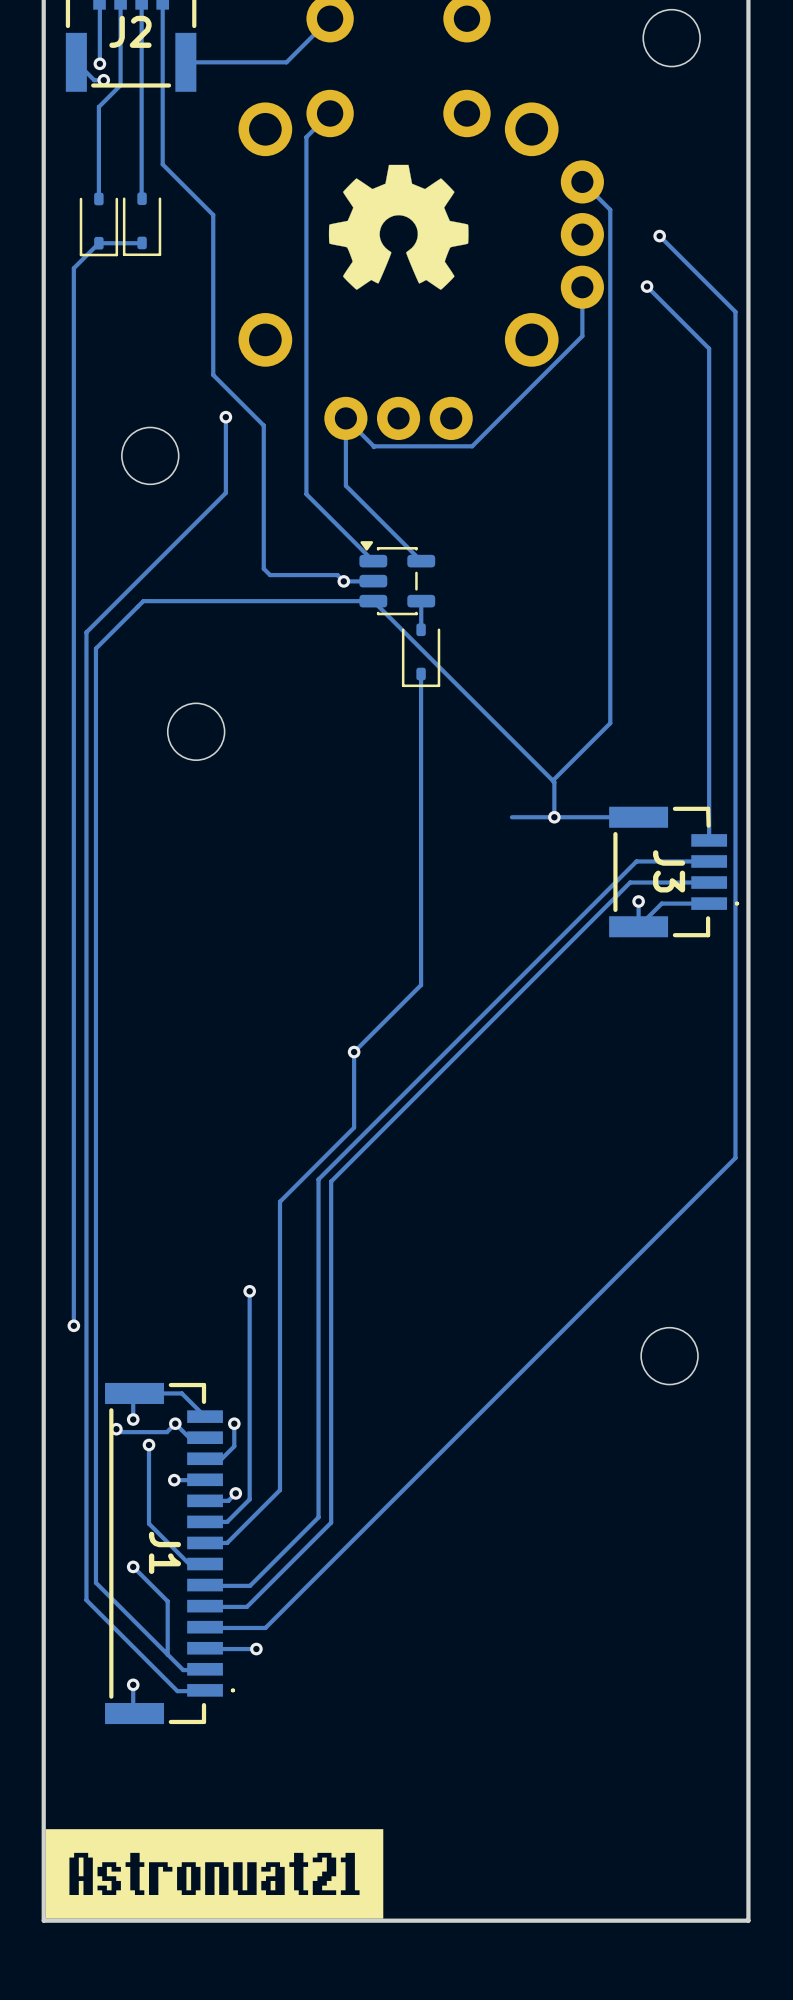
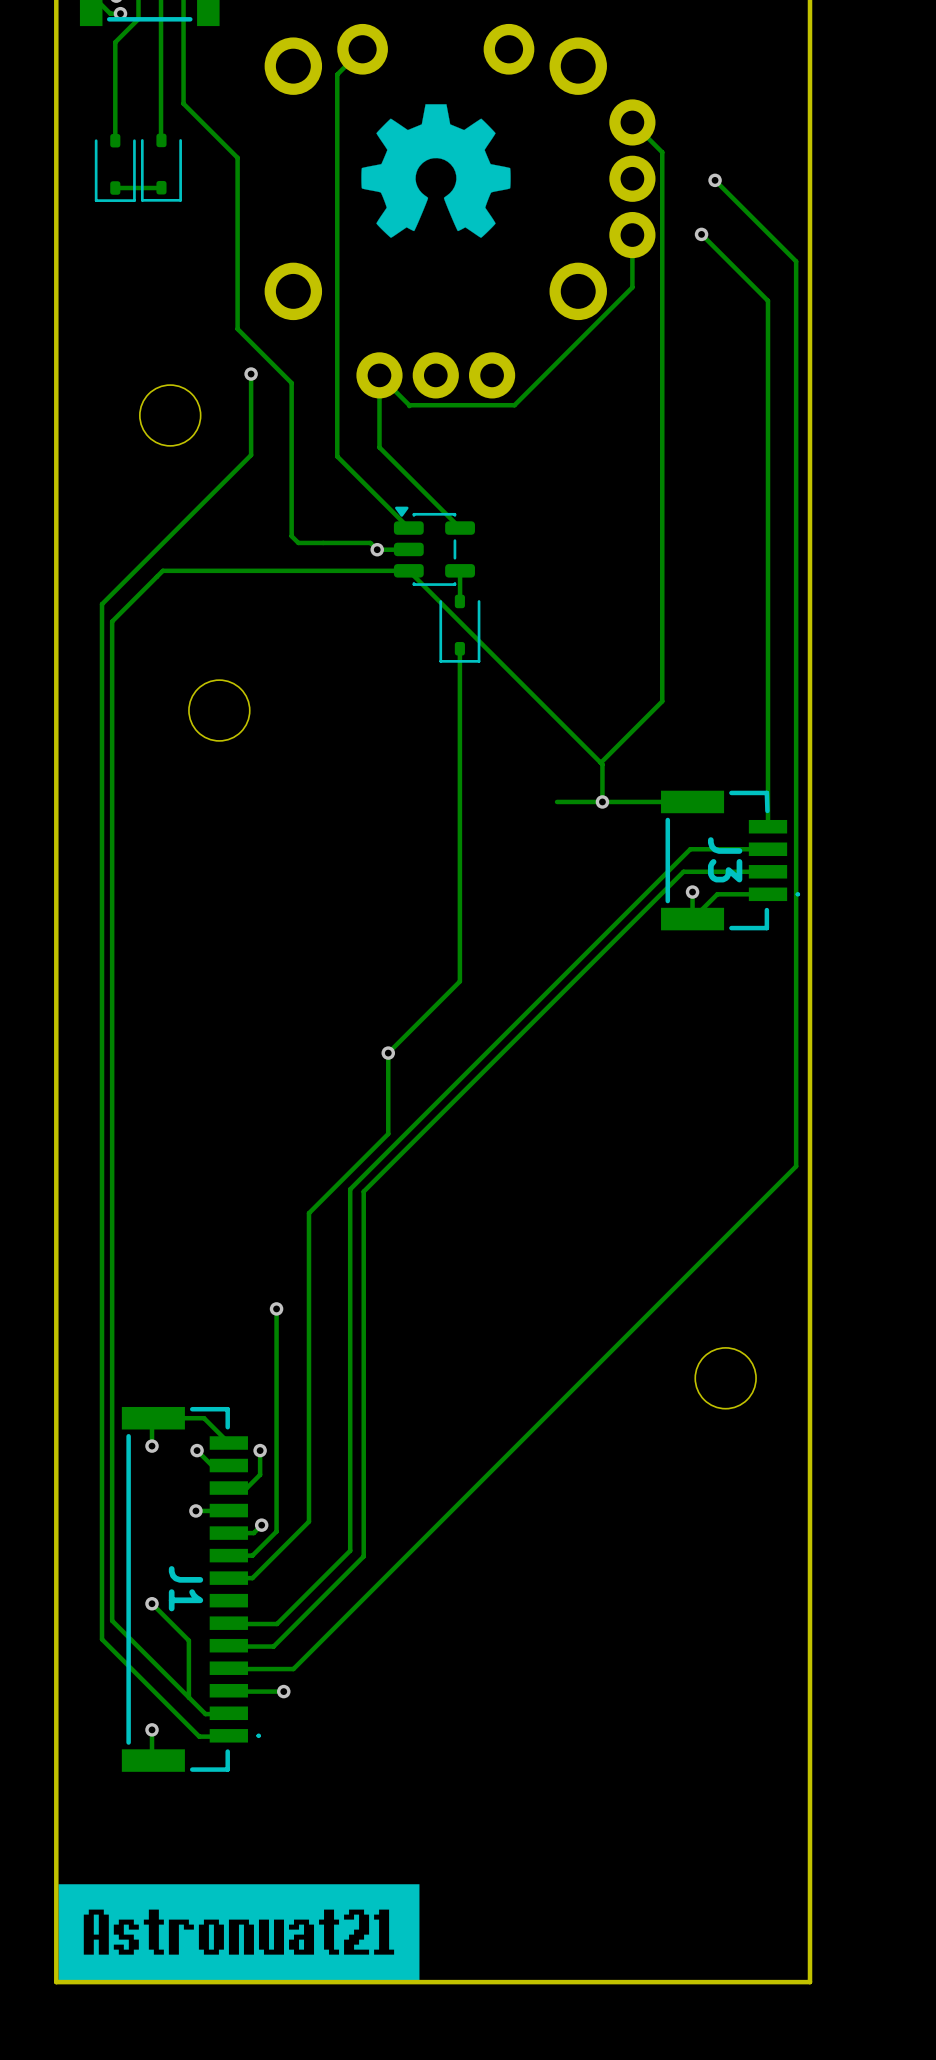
track: (98, 243) (73, 268) (73, 1325) -> none
via: (73, 1325) -> none
track: (175, 1423) (166, 1432) (119, 1432) (116, 1429) -> none
via: (116, 1429) -> none
track: (149, 1444) (149, 1523) (189, 1564) (205, 1564) -> none
via: (149, 1444) -> none

